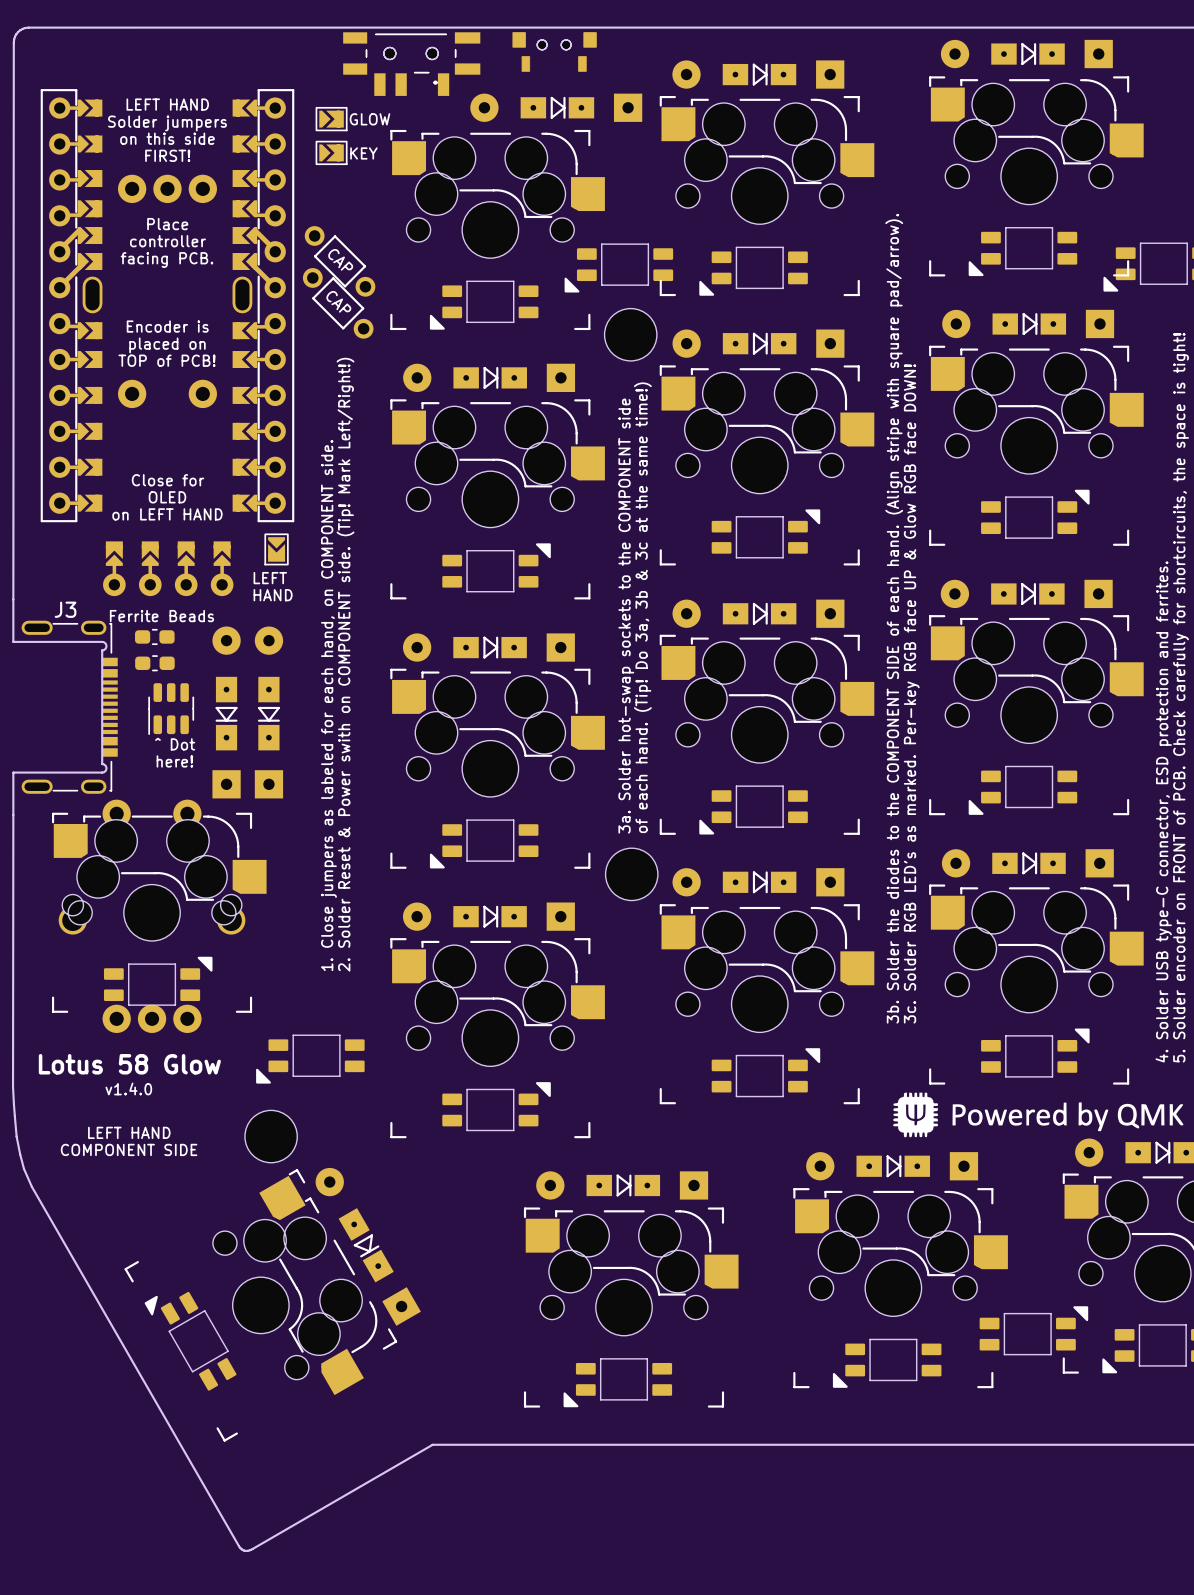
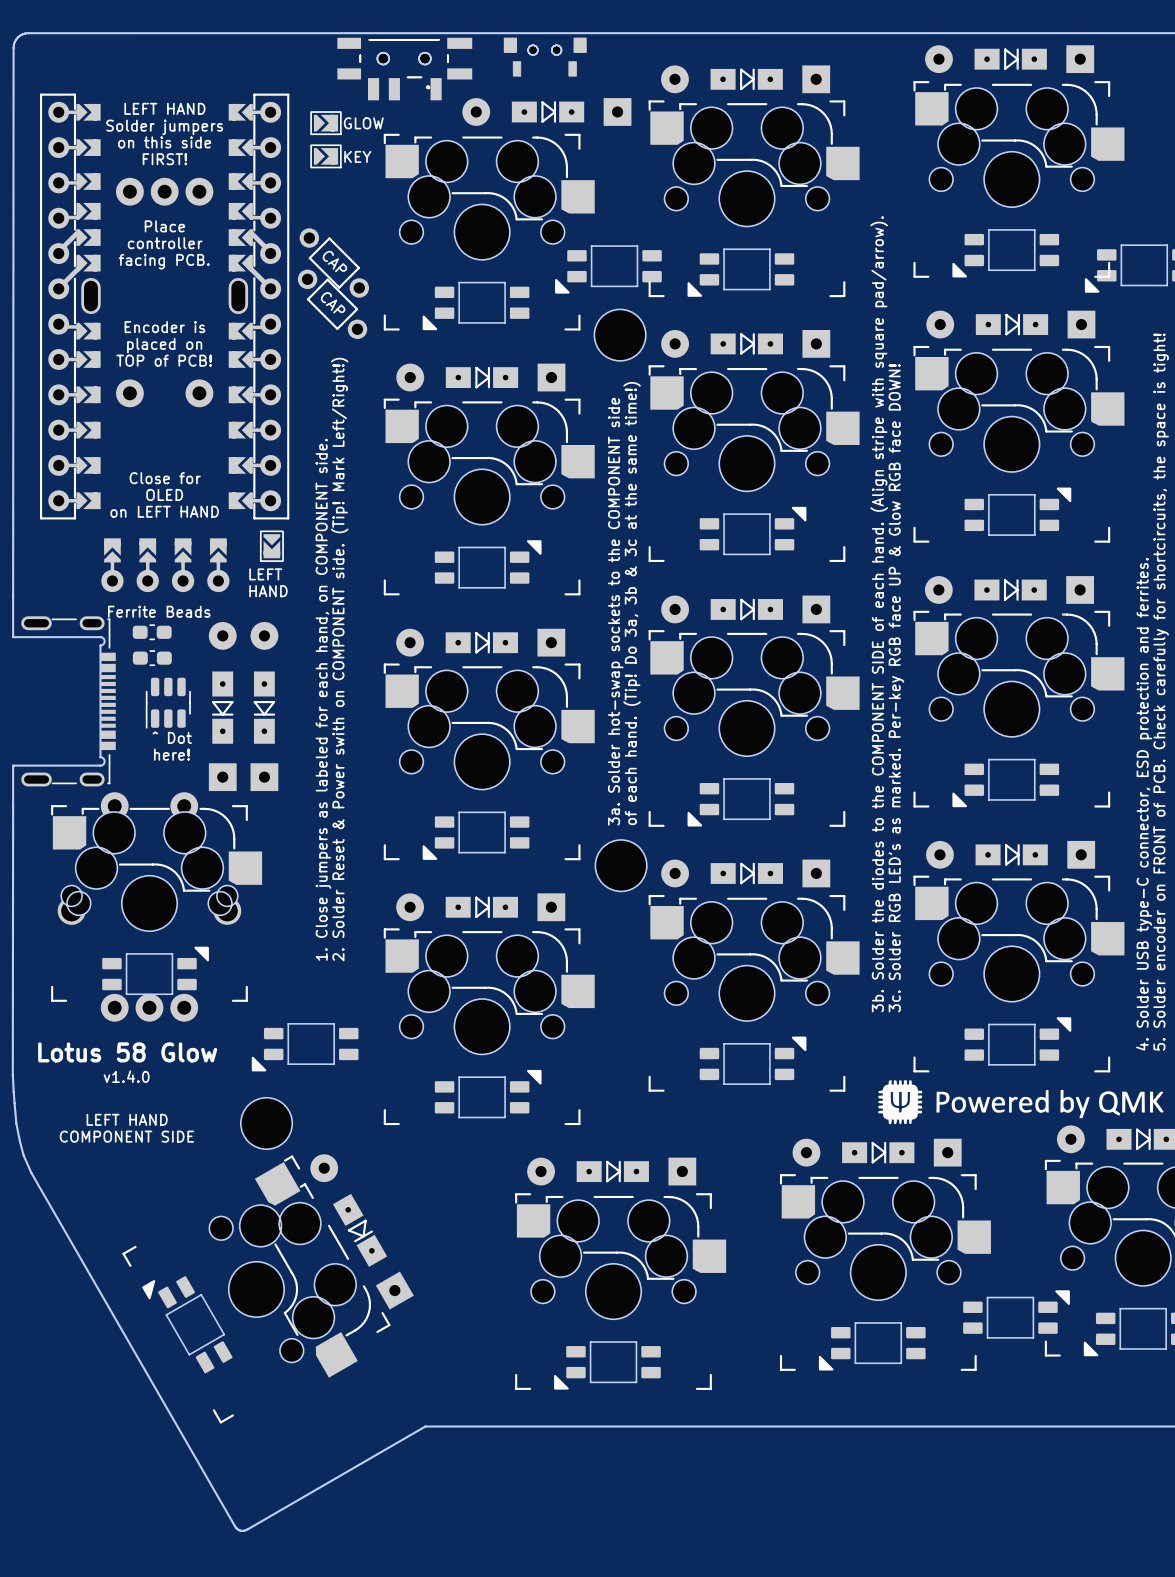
J3 name: J3 (65, 609) -> none

